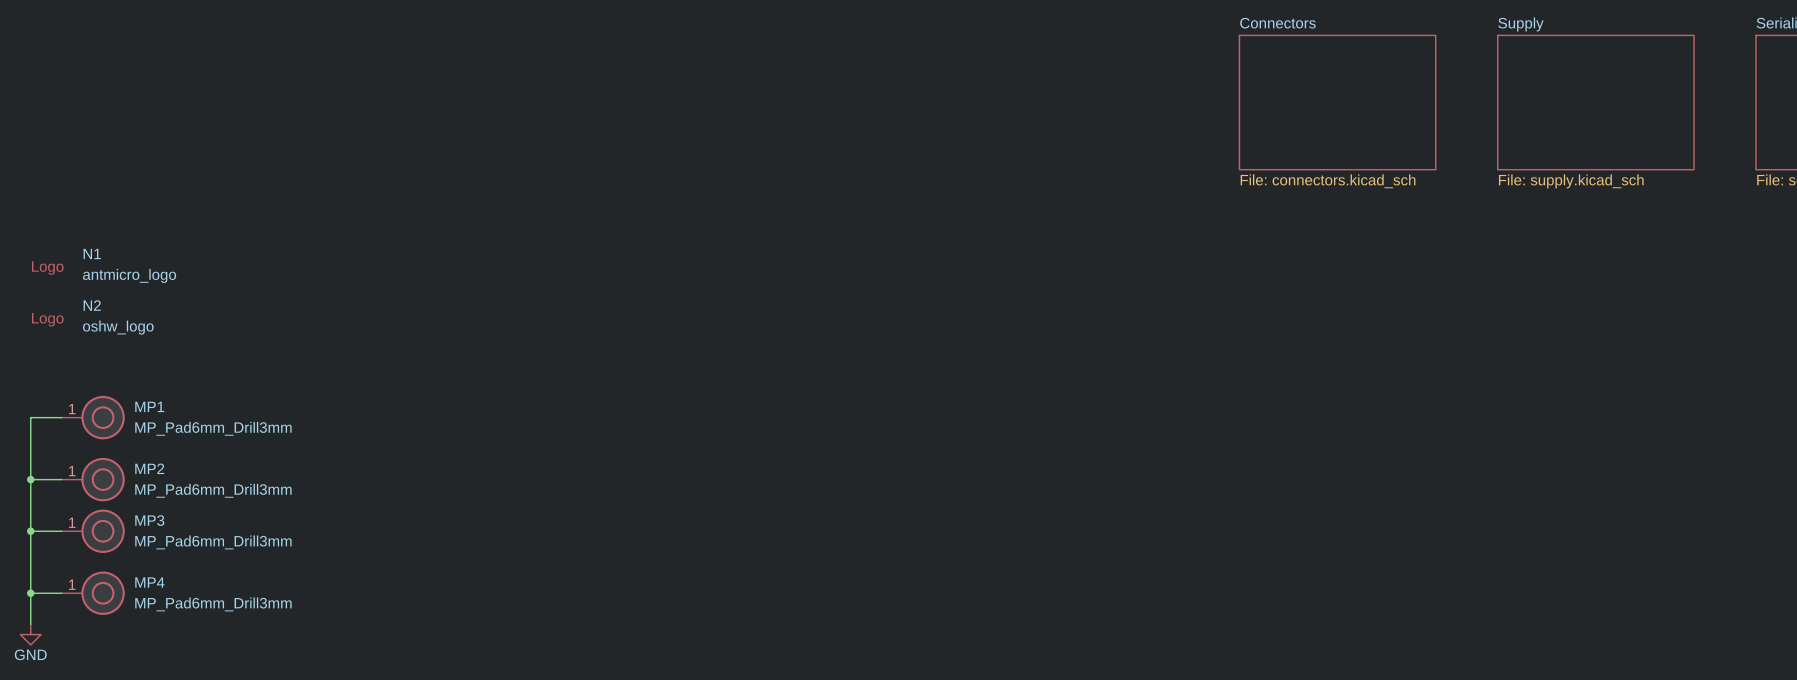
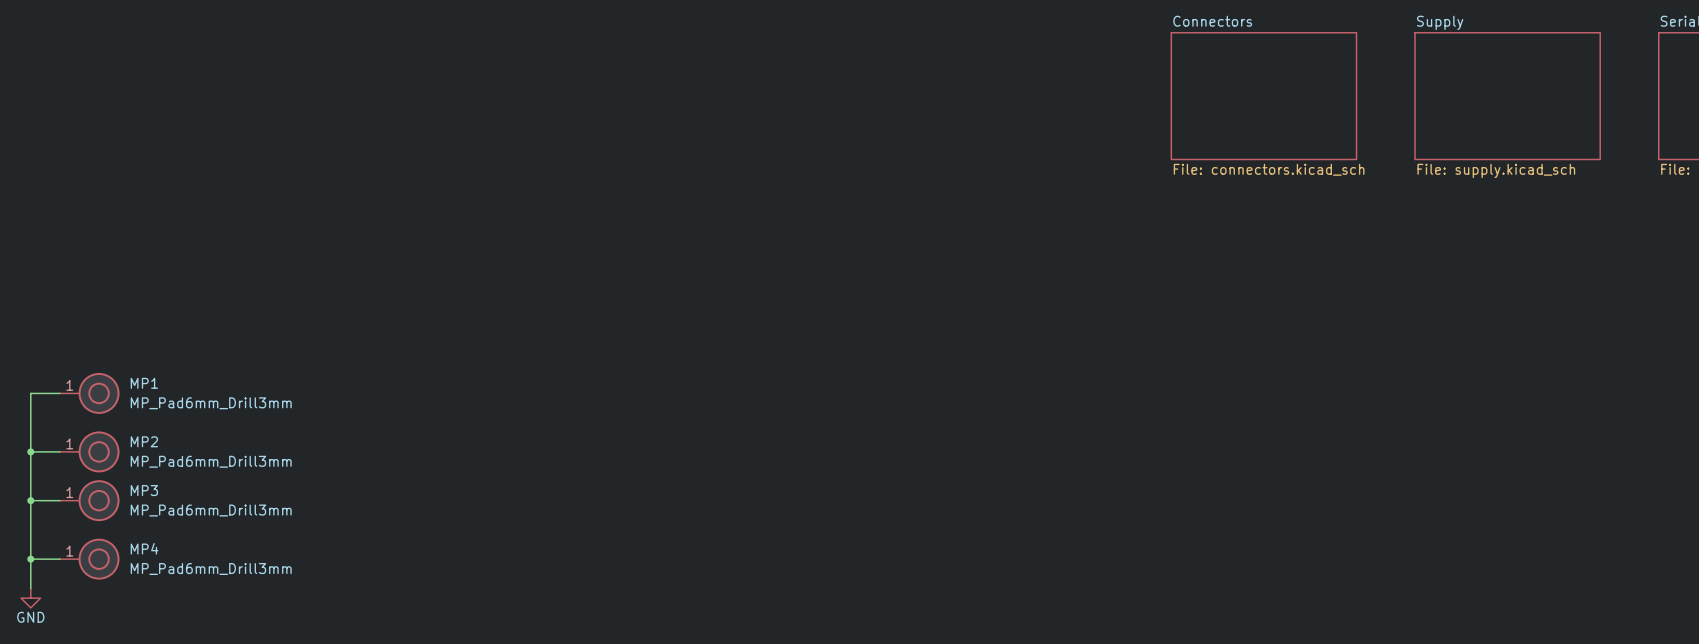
N1: antmicro_logo (104, 265) -> none
N2: oshw_logo (92, 317) -> none

